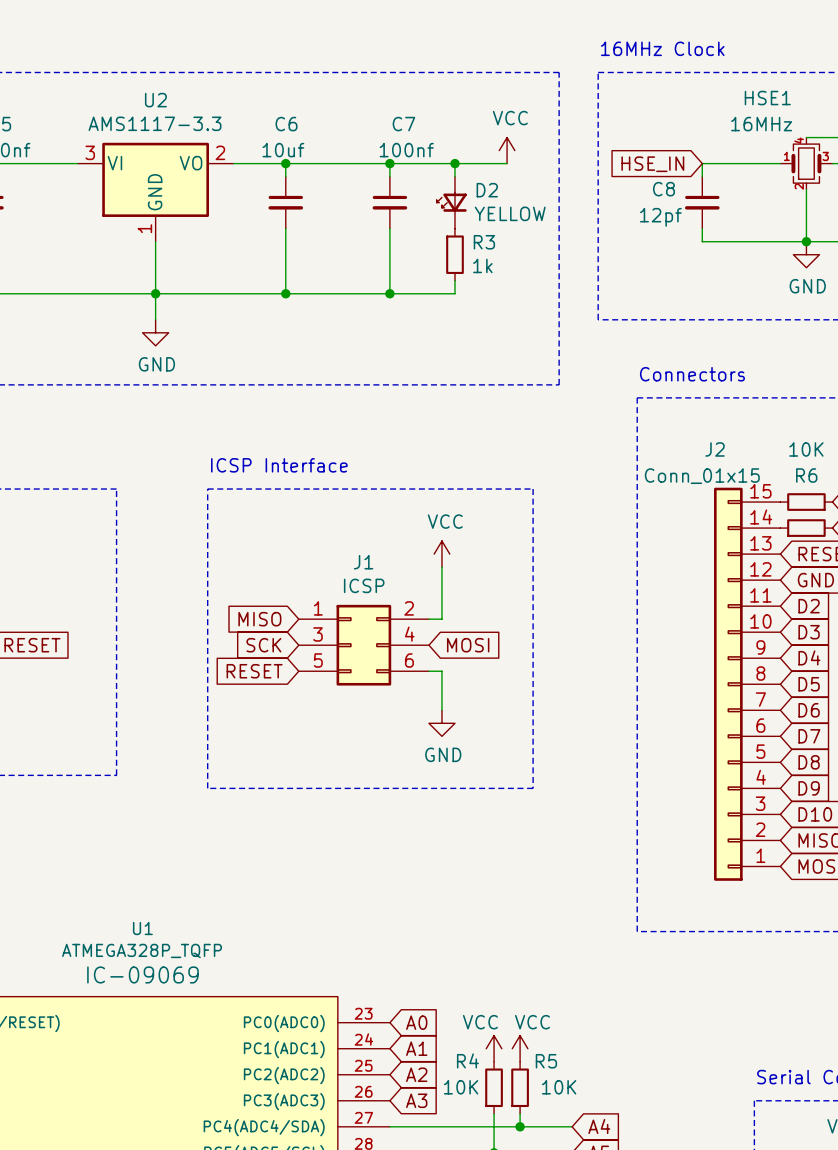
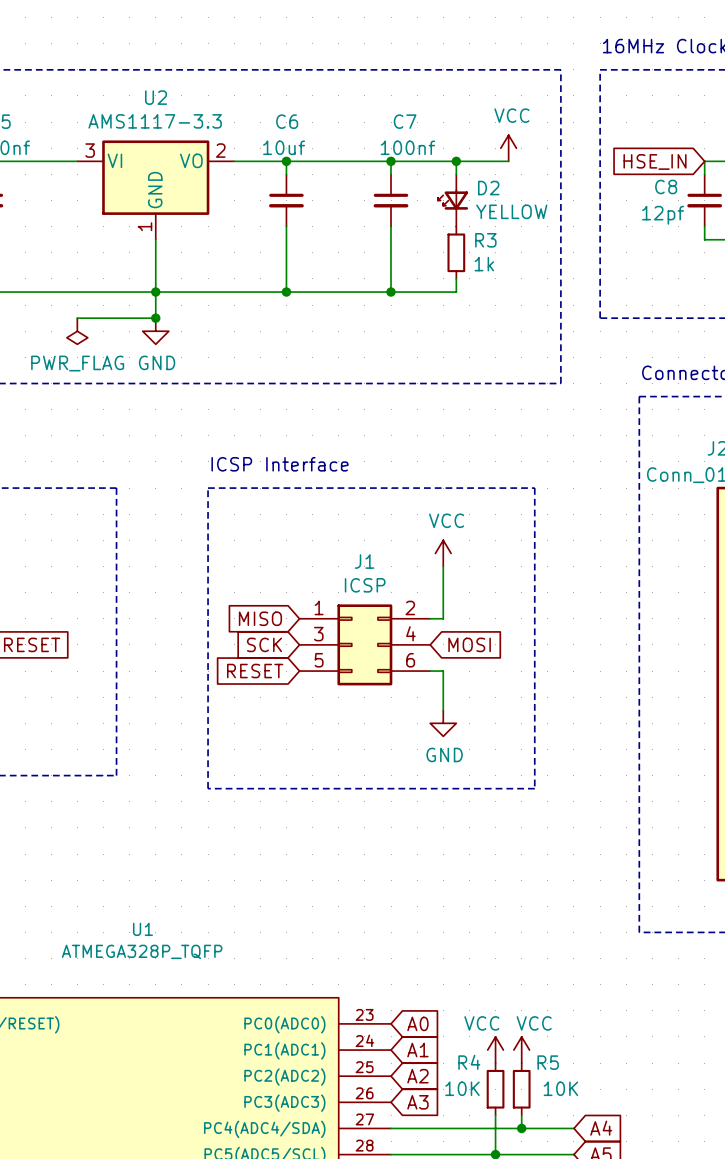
wire: none -> (77, 318) (155, 318)
junction: none -> (155, 318)
power symbol: none -> PWR_FLAG (77, 331)
U1 text: IC-09069 (142, 974) -> none

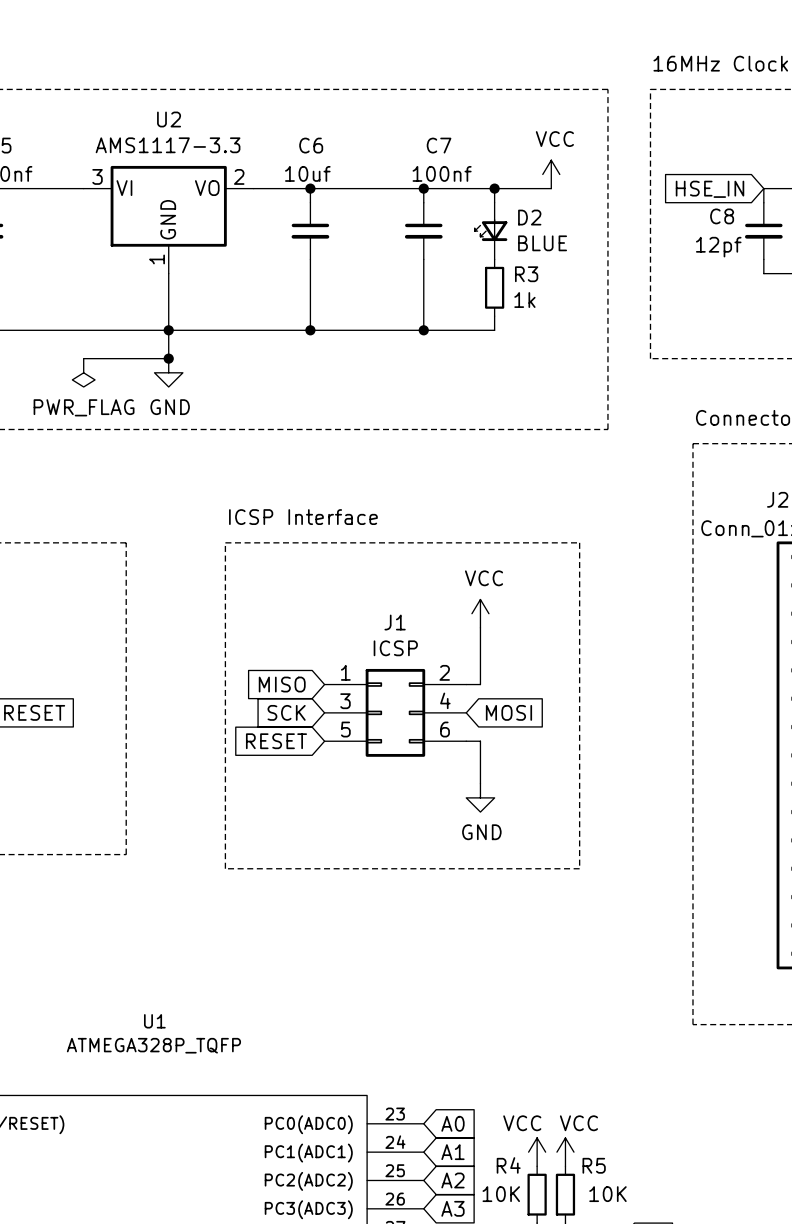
D2 value: YELLOW (511, 211) -> BLUE (542, 243)

